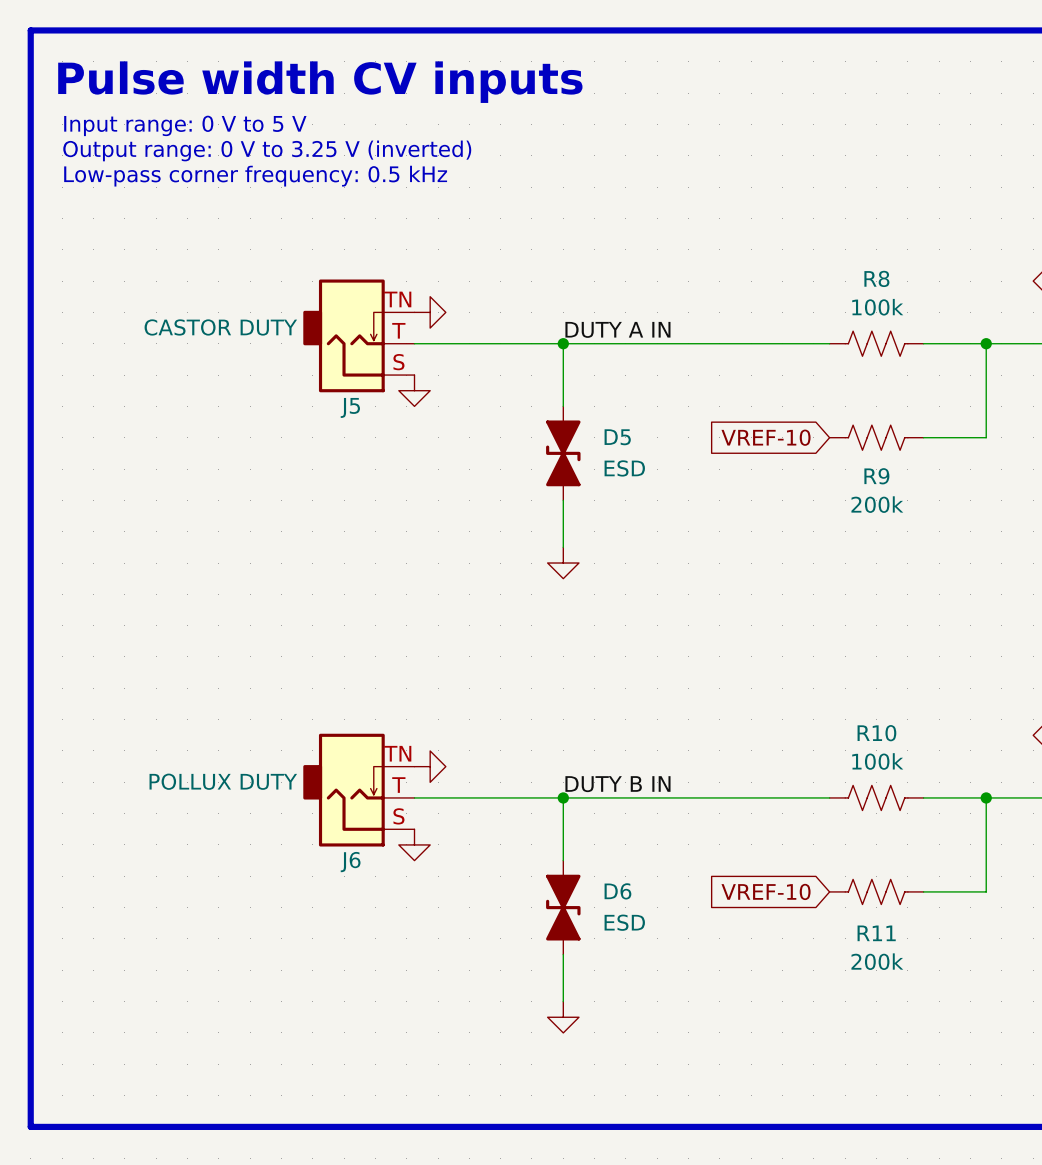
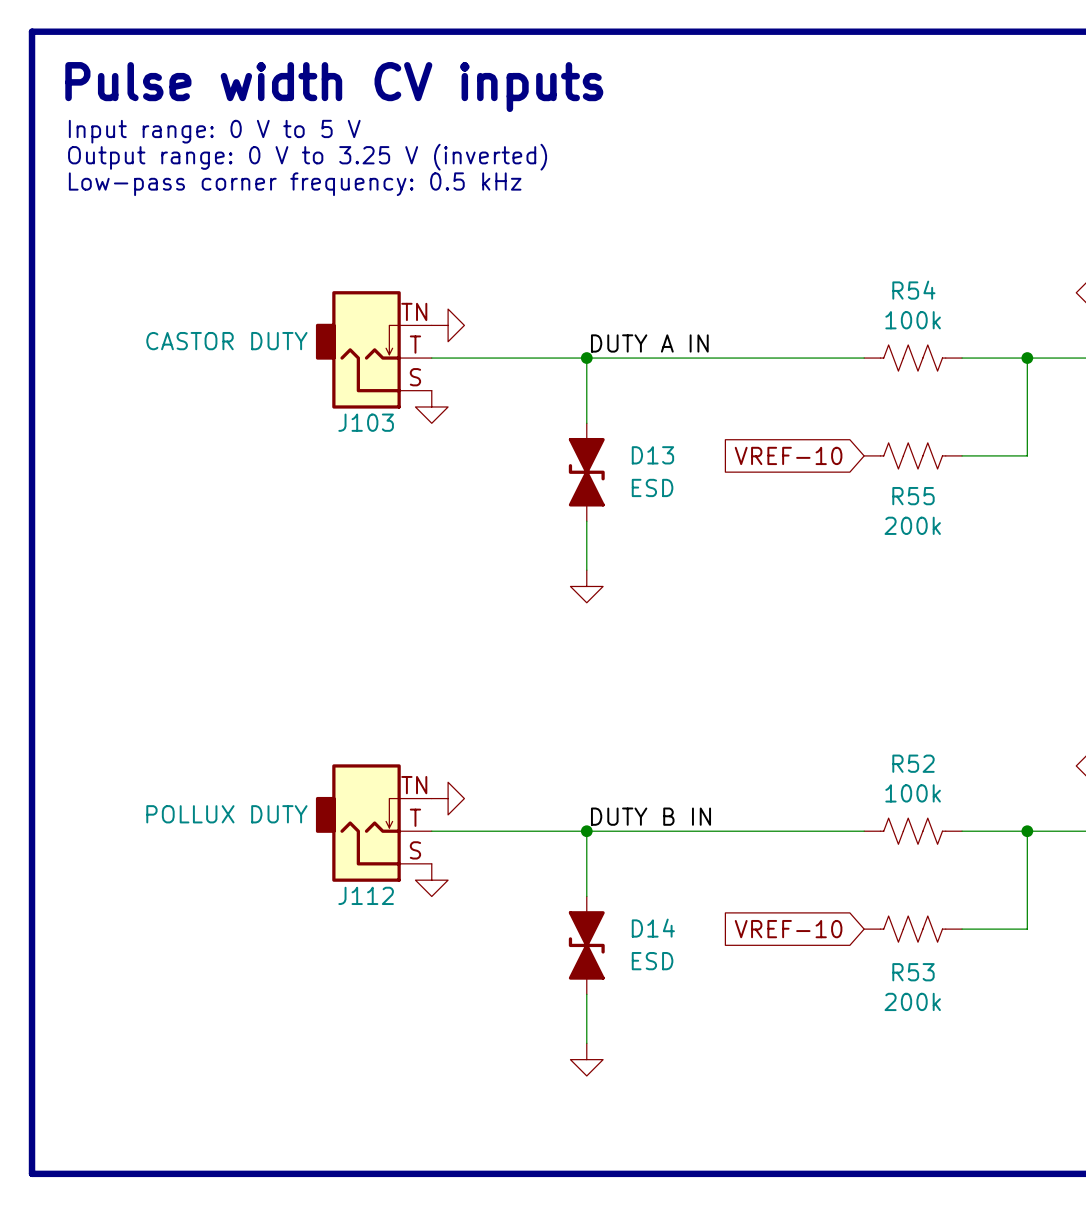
R8 name: R8 (876, 278) -> R54 (913, 290)
J5 name: J5 (350, 407) -> J103 (366, 422)
D5 name: D5 (617, 437) -> D13 (652, 455)
R9 name: R9 (876, 476) -> R55 (913, 496)
R10 name: R10 (876, 733) -> R52 (913, 763)
J6 name: J6 (350, 862) -> J112 (366, 895)
D6 name: D6 (617, 891) -> D14 (653, 928)
R11 name: R11 (876, 933) -> R53 (913, 972)

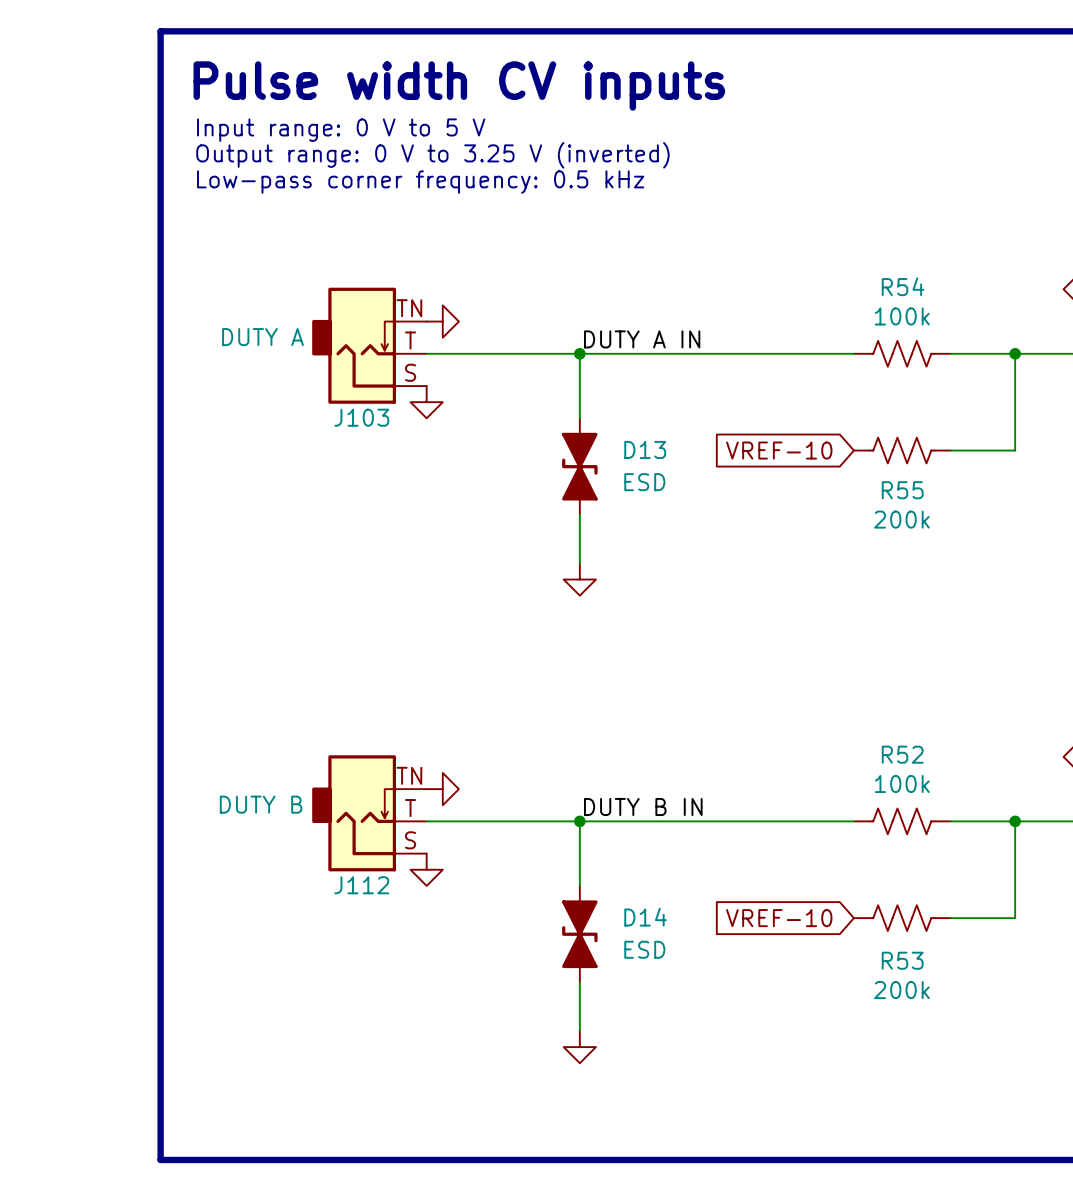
line: (162, 31) (32, 31) (32, 1173) (162, 1173) -> (160, 31) (160, 1159)
text position: Pulse width CV inputs (334, 87) -> Pulse width CV inputs (459, 86)
text position: Input range: 0 V to 5 V (214, 131) -> Input range: 0 V to 5 V (341, 130)
text position: Output range: 0 V to 3.25 V (inverted) (307, 157) -> Output range: 0 V to 3.25 V (inverted) (432, 155)
text position: Low-pass corner frequency: 0.5 kHz (295, 184) -> Low-pass corner frequency: 0.5 kHz (420, 182)
J103 value: CASTOR DUTY (226, 341) -> DUTY A (263, 337)
J112 value: POLLUX DUTY (226, 814) -> DUTY B (261, 804)

